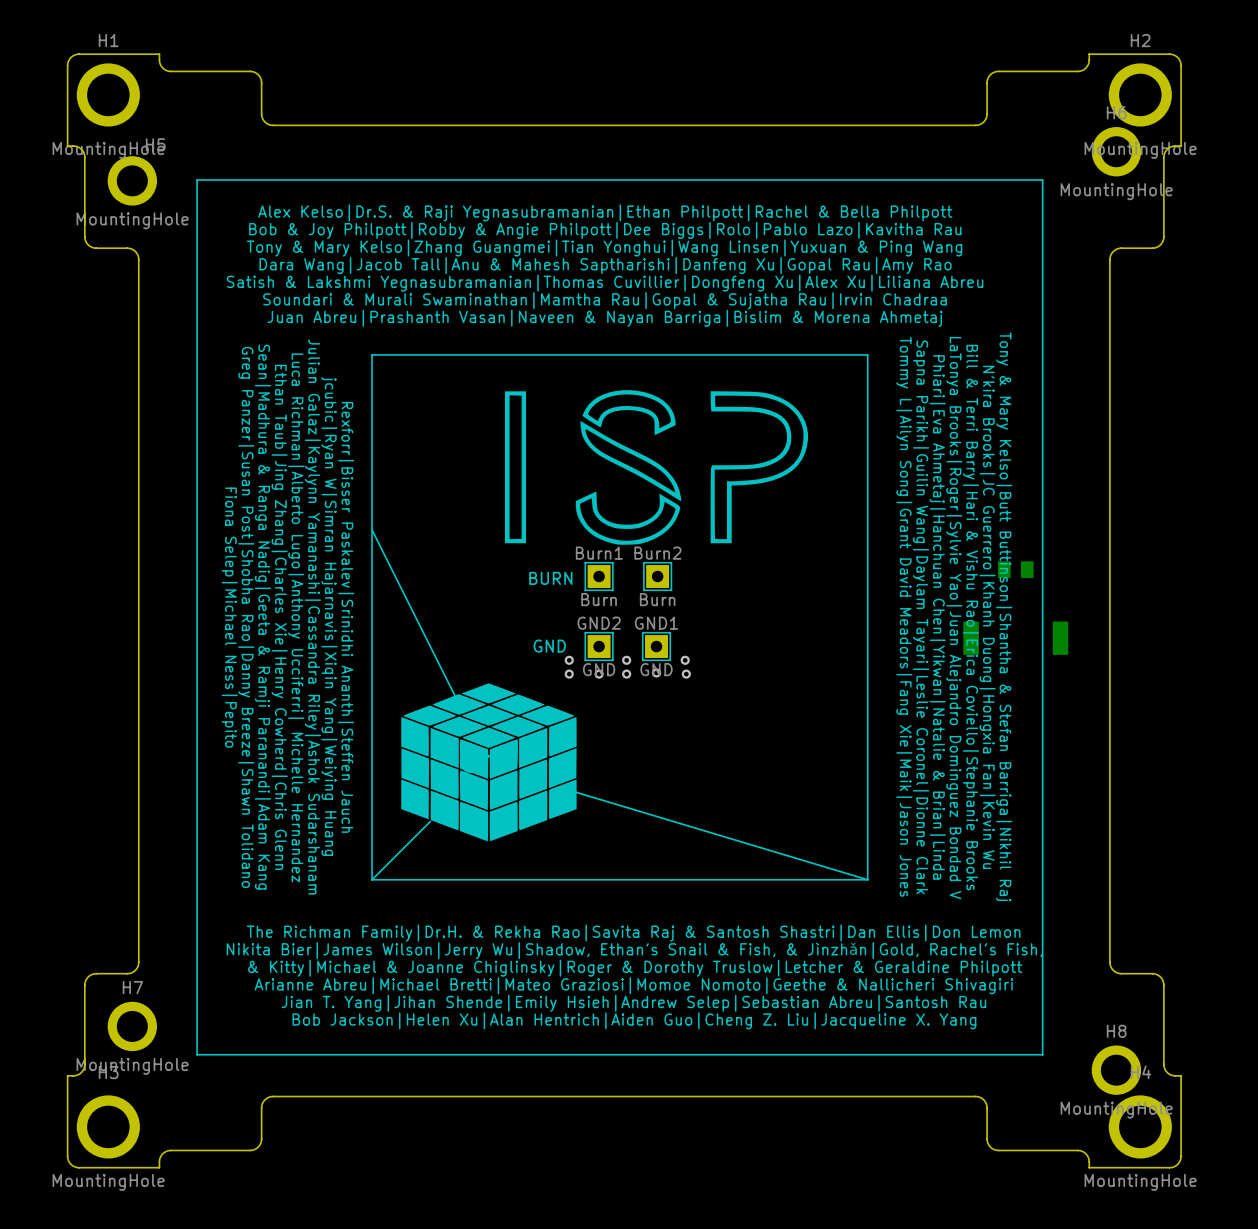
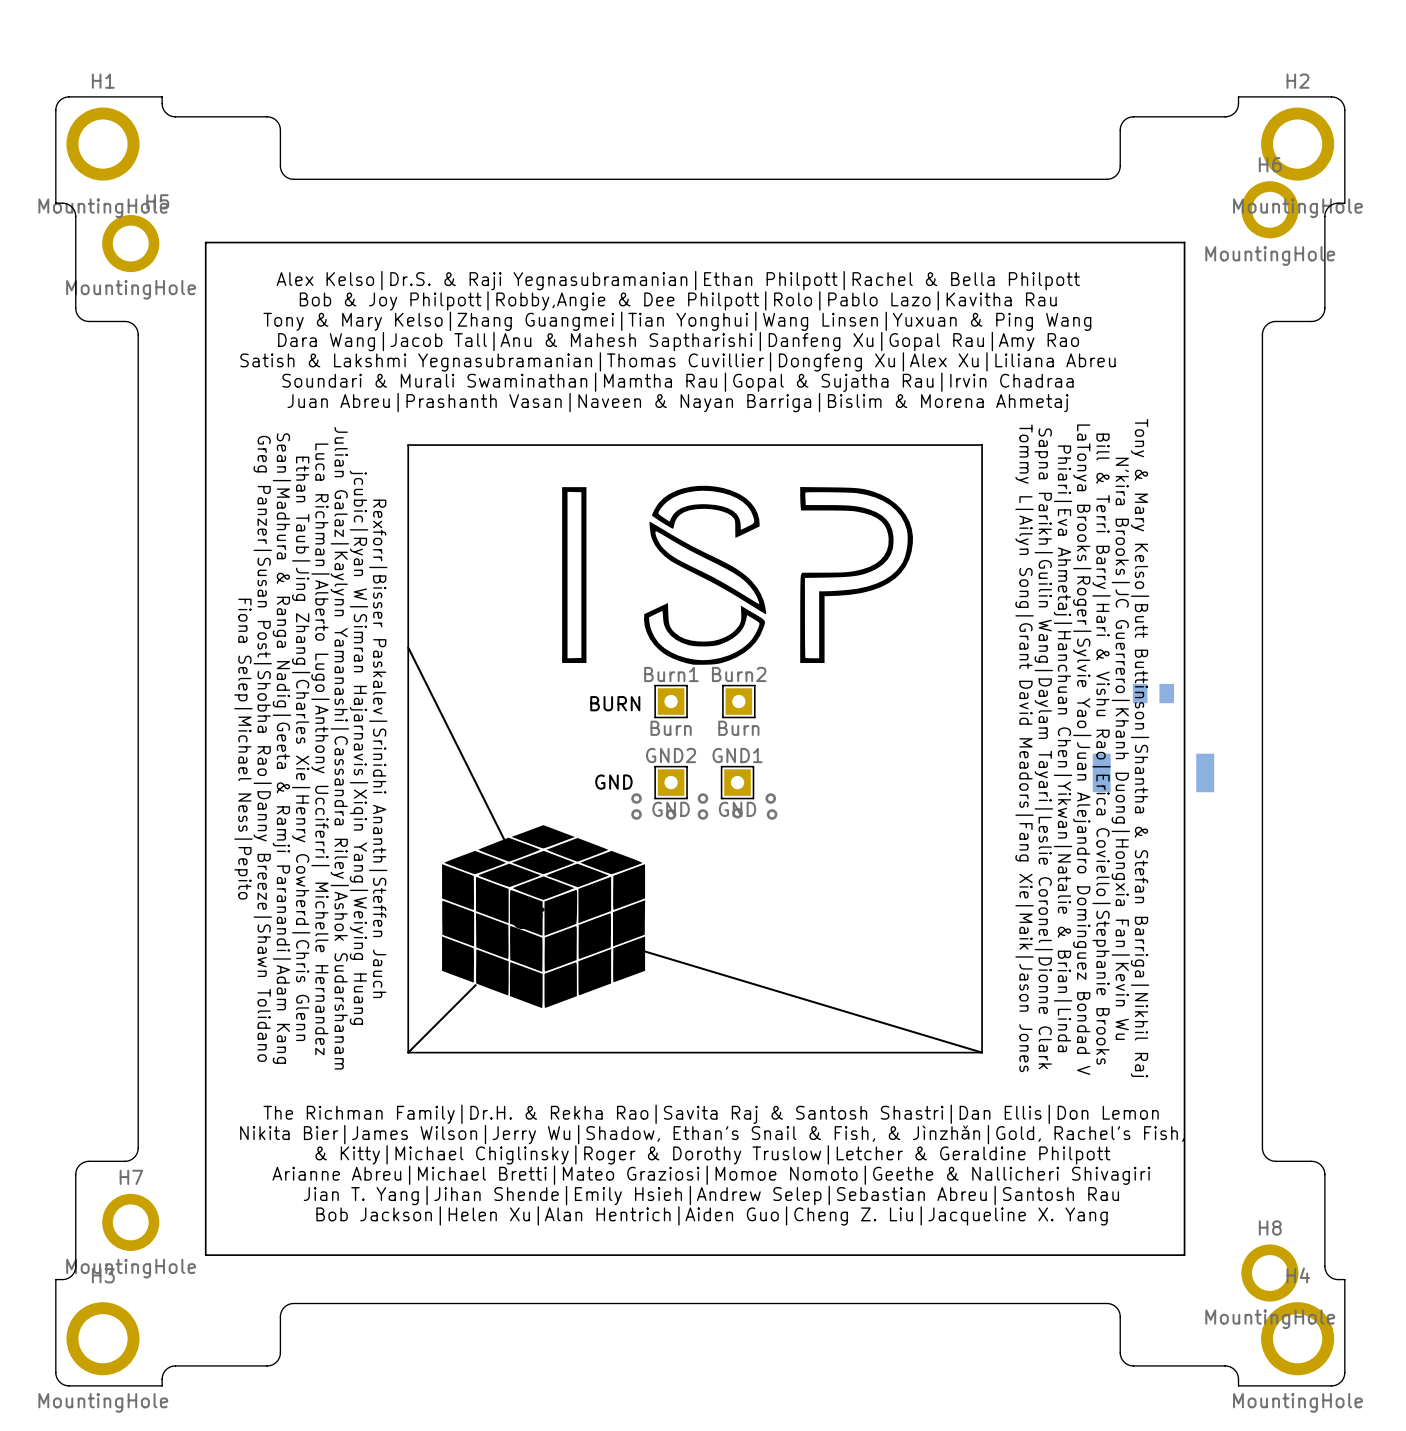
text: Bob & Joy Philpott|Robby & Angie Philpott|Dee Biggs|Rolo|Pablo Lazo|Kavitha Rau (605, 230) -> Bob & Joy Philpott|Robby,Angie & Dee Philpott|Rolo|Pablo Lazo|Kavitha Rau (678, 300)
text: & Kitty|Michael & Joanne Chiglinsky|Roger & Dorothy Truslow|Letcher & Geraldine Philpott (635, 968) -> & Kitty|Michael Chiglinsky|Roger & Dorothy Truslow|Letcher & Geraldine Philpott (712, 1154)

